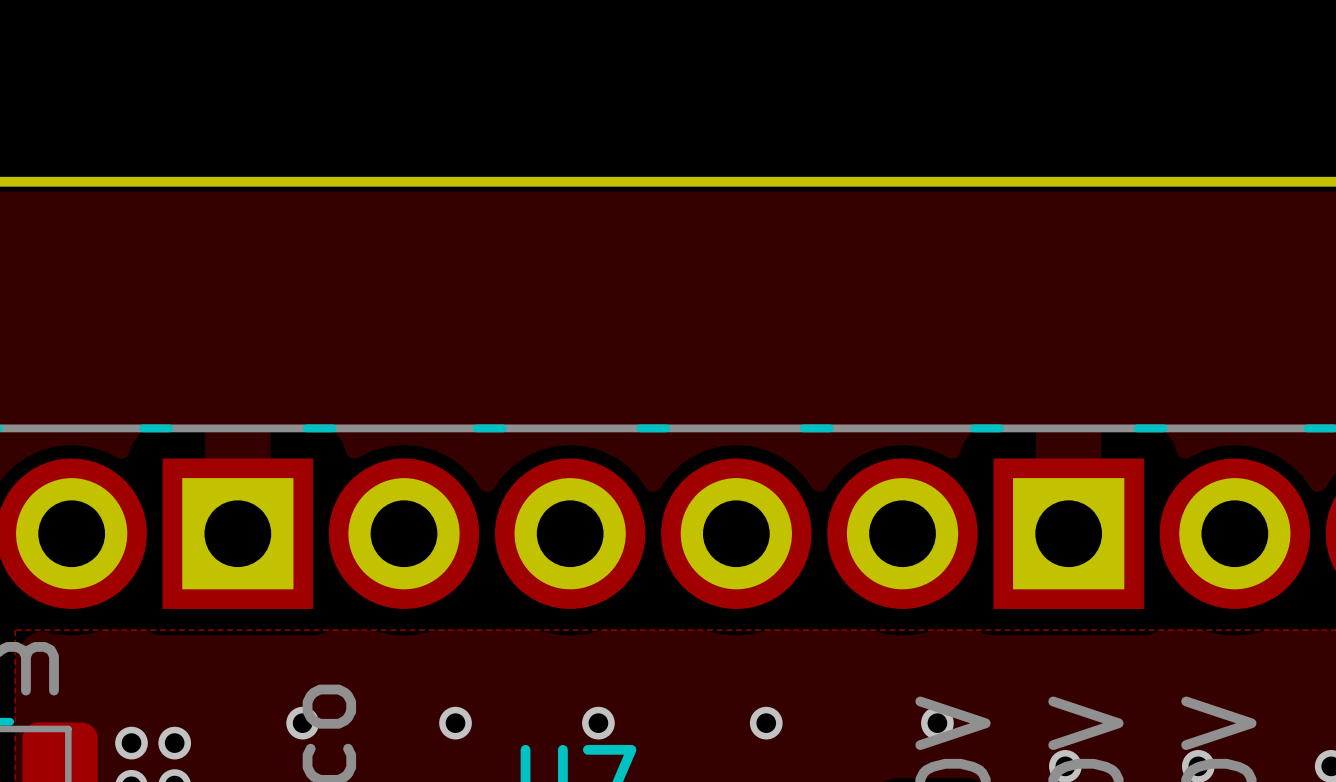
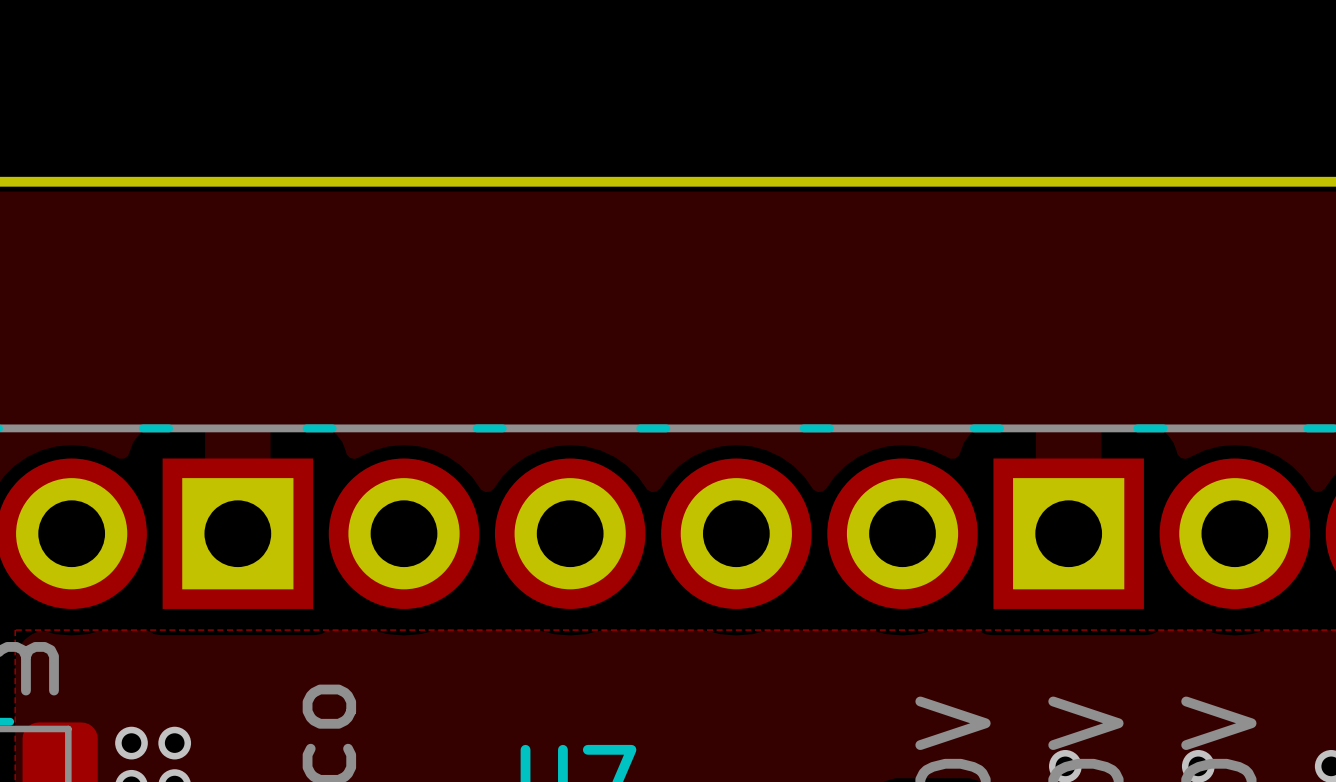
via: (302, 723) -> none
via: (455, 723) -> none
via: (598, 723) -> none
via: (766, 723) -> none
via: (937, 723) -> none

